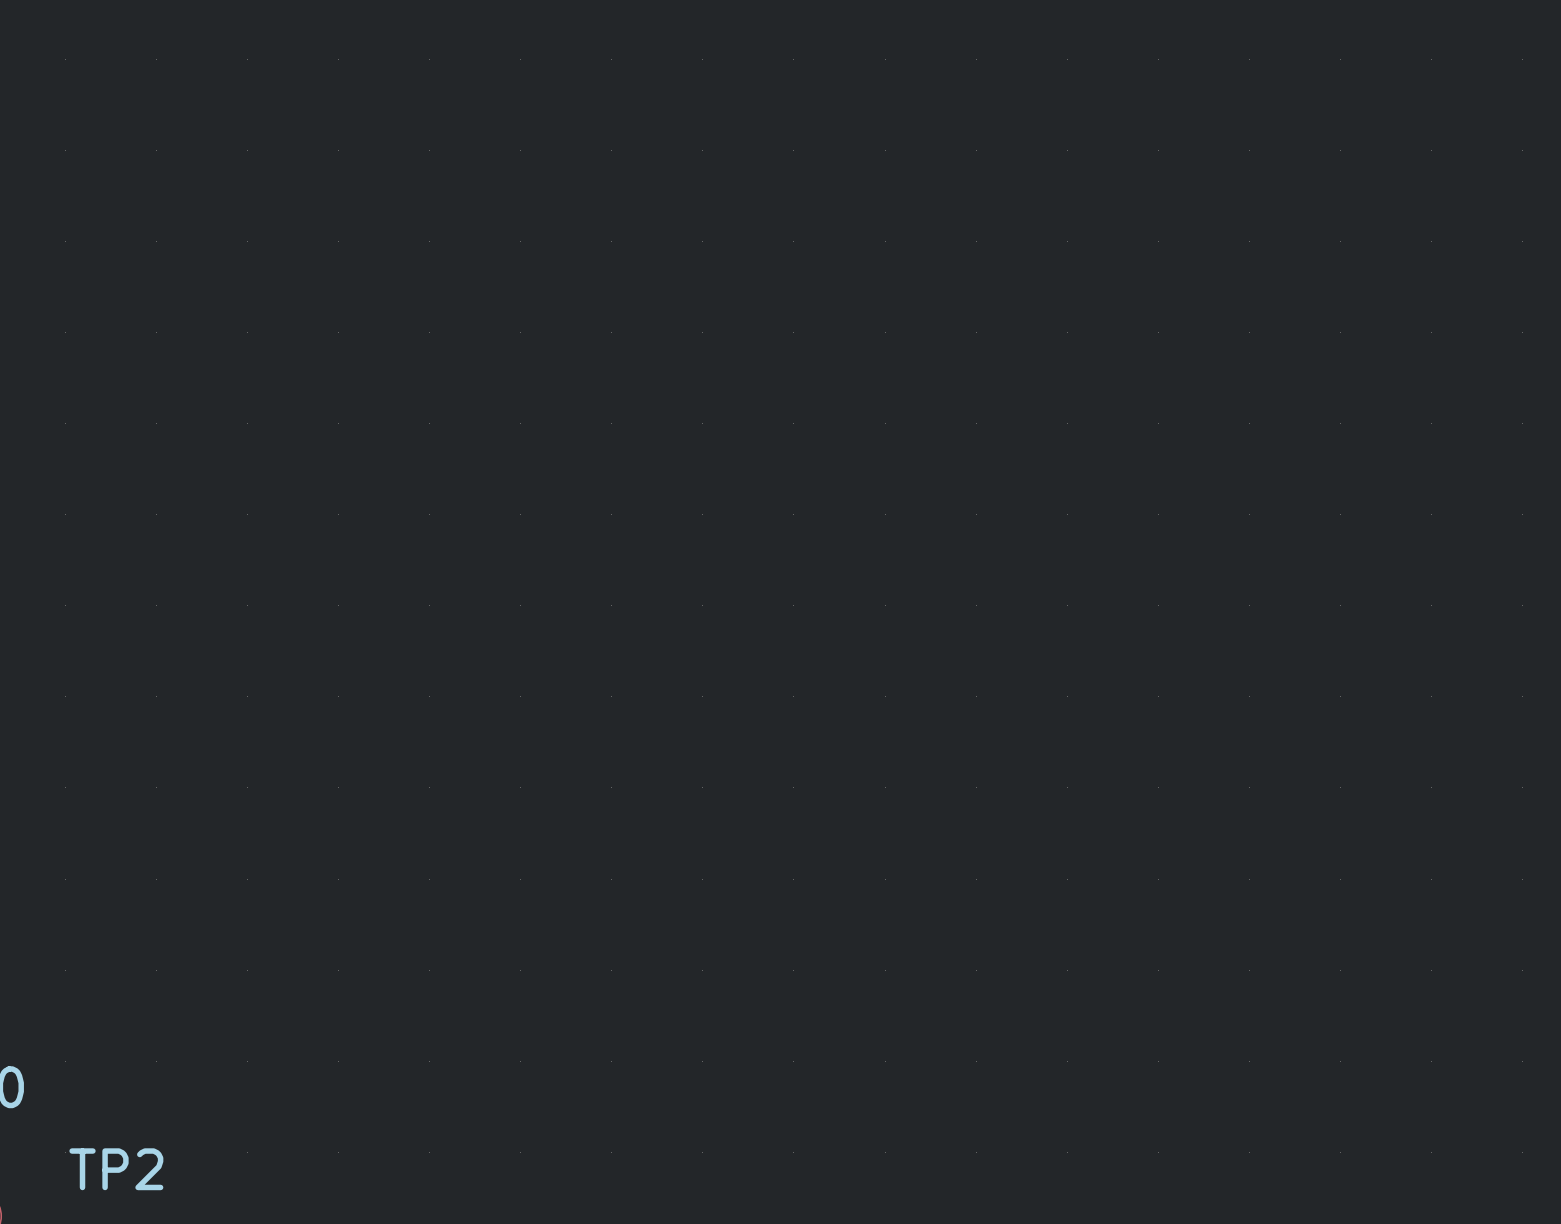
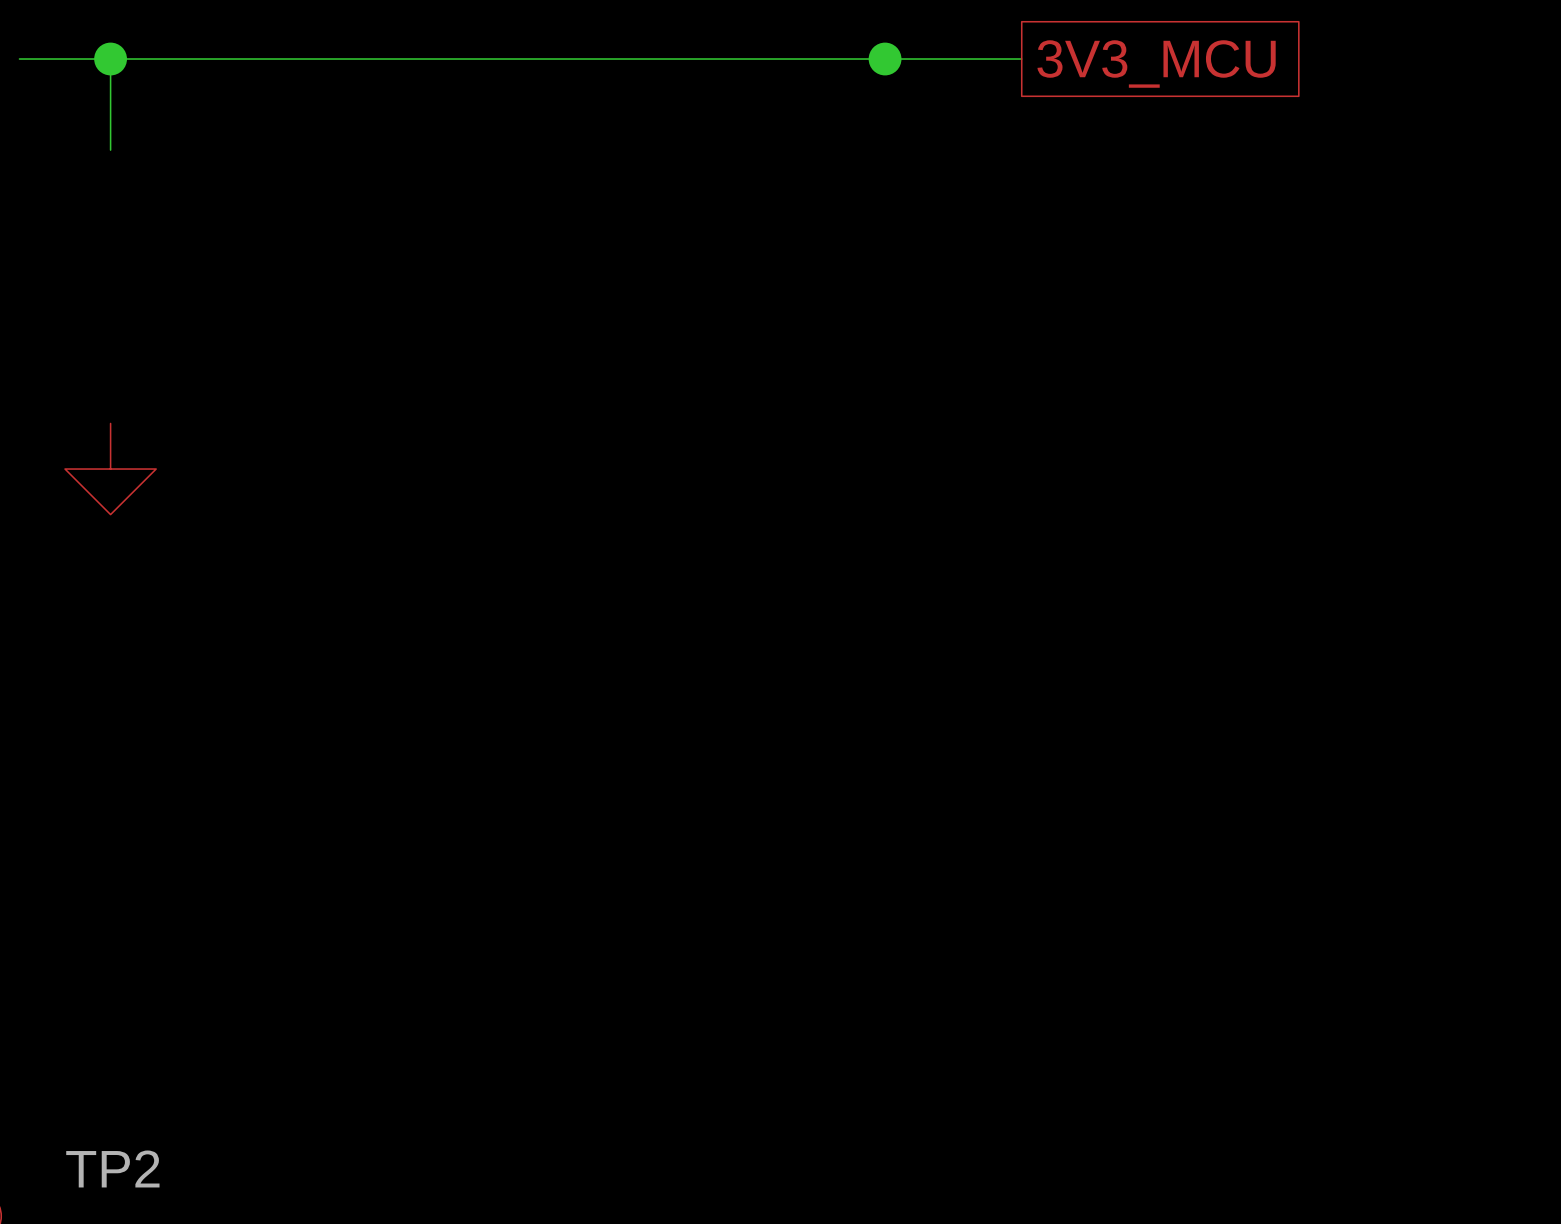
wire: none -> (19, 59) (1021, 59)
wire: none -> (110, 59) (110, 150)
junction: none -> (110, 59)
junction: none -> (885, 59)
global label: none -> 3V3_MCU (1156, 64)
power symbol: none -> (110, 469)

